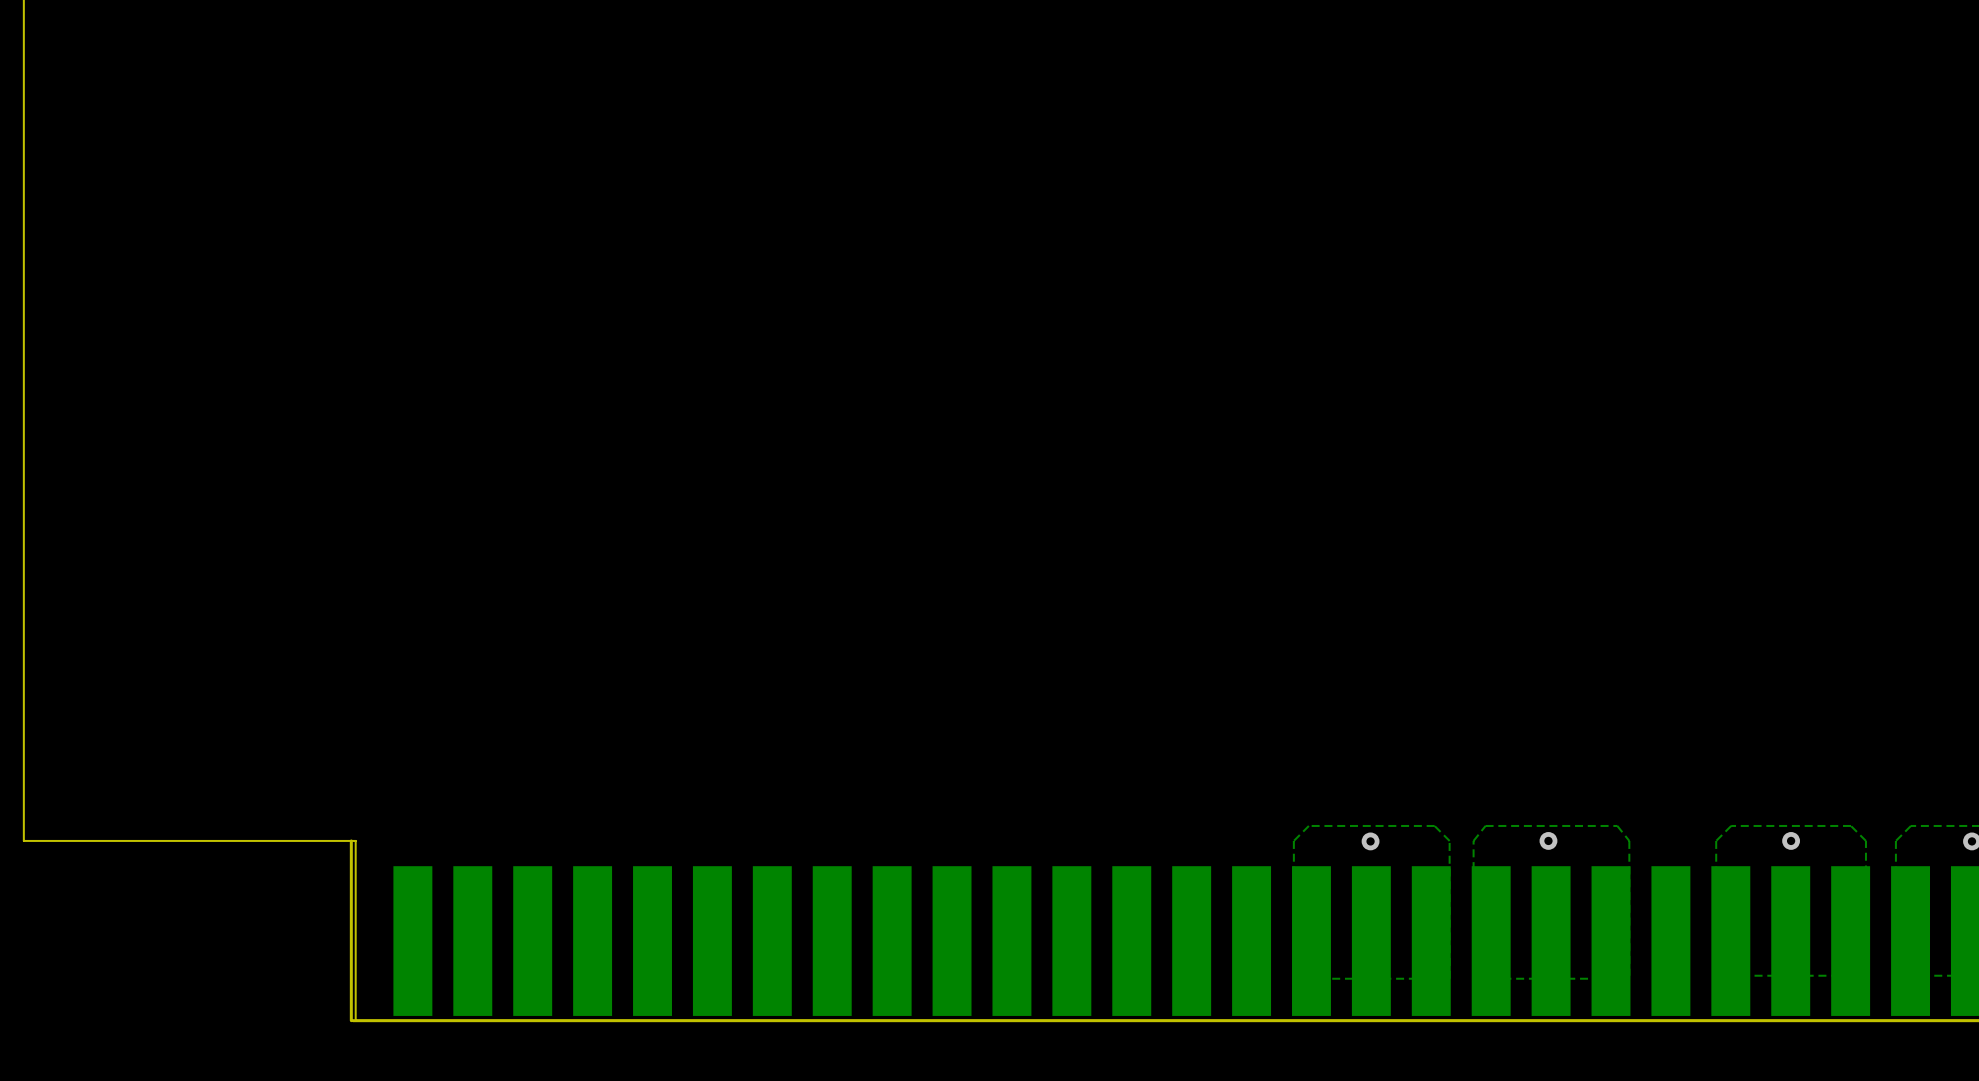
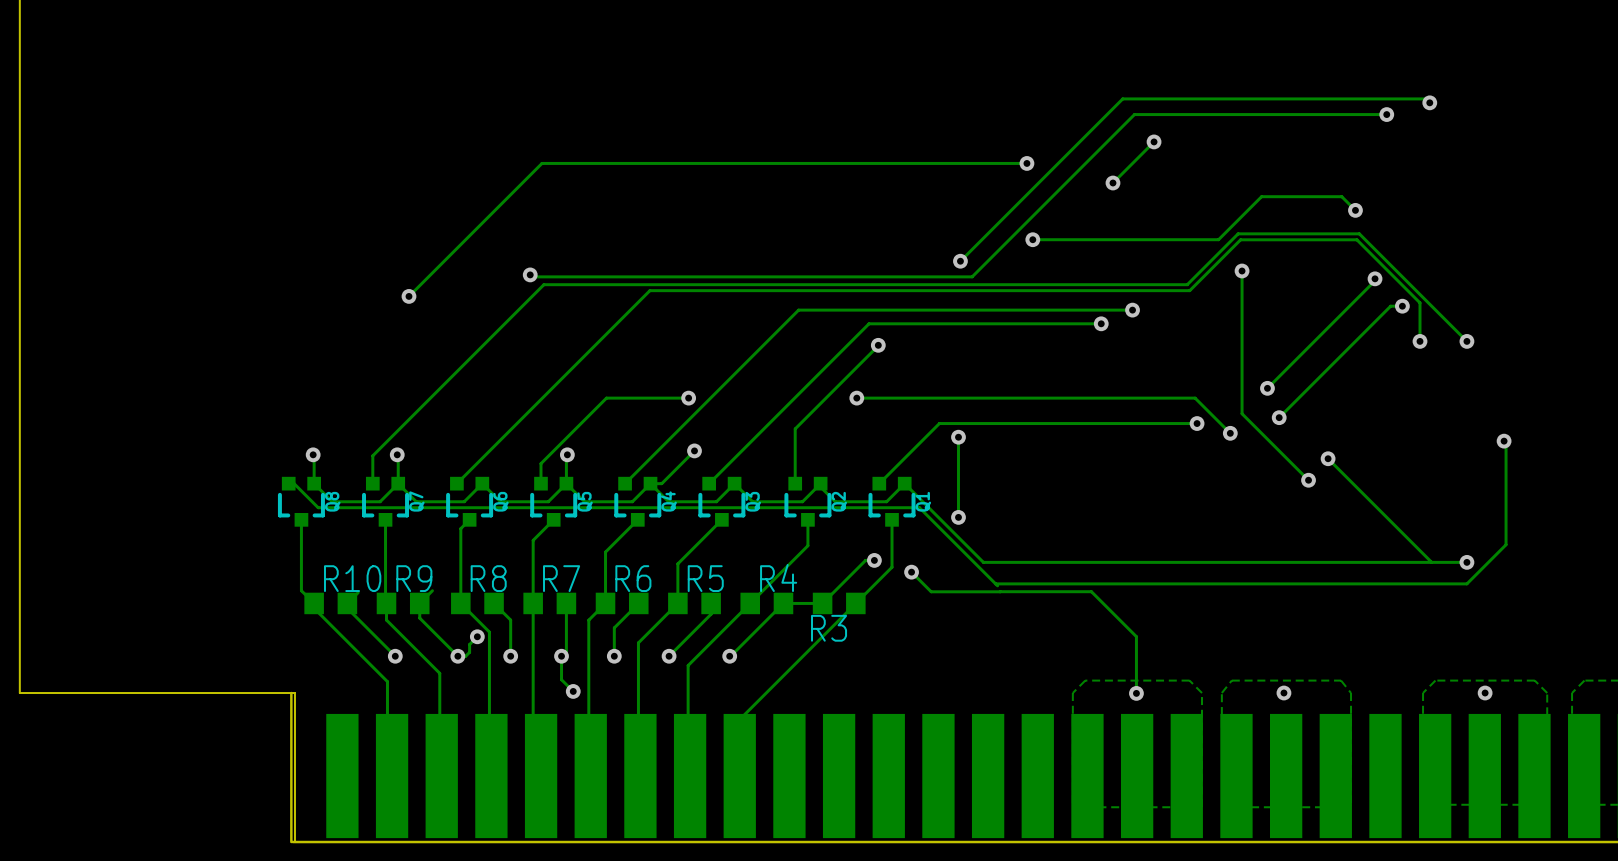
track: none -> (1429, 102) (1425, 98) (1122, 98) (960, 261)
via: none -> (1429, 102)
track: none -> (1386, 114) (1134, 114) (972, 276) (532, 276) (530, 274)
via: none -> (1386, 114)
track: none -> (1154, 141) (1112, 183)
via: none -> (1154, 141)
track: none -> (1026, 163) (541, 163) (408, 296)
via: none -> (1026, 163)
via: none -> (1112, 183)
track: none -> (1355, 210) (1341, 196) (1261, 196) (1218, 239) (1032, 239)
via: none -> (1355, 210)
via: none -> (1032, 239)
via: none -> (960, 261)
track: none -> (1242, 271) (1242, 413) (1308, 480)
via: none -> (1242, 271)
via: none -> (530, 274)
track: none -> (1375, 278) (1267, 388)
via: none -> (1375, 278)
via: none -> (408, 296)
track: none -> (1402, 306) (1390, 306) (1279, 417)
via: none -> (1402, 306)
track: none -> (1132, 310) (798, 310) (625, 483)
via: none -> (1132, 310)
track: none -> (1101, 323) (869, 323) (709, 483)
via: none -> (1101, 323)
track: none -> (1420, 341) (1420, 302) (1356, 239) (1240, 239) (1189, 290) (649, 290) (456, 483)
via: none -> (1420, 341)
track: none -> (1466, 341) (1359, 233) (1238, 233) (1187, 284) (543, 284) (372, 455) (372, 483)
via: none -> (1466, 341)
track: none -> (878, 345) (795, 428) (795, 483)
via: none -> (878, 345)
via: none -> (1267, 388)
track: none -> (688, 398) (606, 398) (540, 463) (540, 483)
via: none -> (688, 398)
track: none -> (856, 398) (1195, 398) (1230, 433)
via: none -> (856, 398)
via: none -> (1279, 417)
track: none -> (1197, 423) (939, 423) (879, 483)
via: none -> (1197, 423)
via: none -> (1230, 433)
track: none -> (958, 437) (958, 517)
via: none -> (958, 437)
track: none -> (1504, 441) (1506, 443) (1506, 544) (1466, 583) (995, 583)
via: none -> (1504, 441)
track: none -> (694, 450) (661, 483) (650, 483)
via: none -> (694, 450)
track: none -> (313, 454) (314, 483) (332, 501) (380, 501) (398, 483)
via: none -> (313, 454)
track: none -> (397, 454) (398, 483)
via: none -> (397, 454)
track: none -> (567, 454) (566, 483)
via: none -> (567, 454)
track: none -> (1328, 458) (1431, 562)
via: none -> (1328, 458)
via: none -> (1308, 480)
track: none -> (288, 483) (294, 483) (318, 507) (919, 507) (997, 585)
track: none -> (566, 483) (548, 501) (500, 501) (482, 483) (464, 501) (416, 501) (398, 483)
track: none -> (650, 483) (668, 501) (716, 501) (734, 483) (752, 501) (802, 501) (820, 483) (820, 487) (835, 501) (886, 501) (904, 483) (983, 562) (1466, 562)
track: none -> (650, 483) (632, 501) (584, 501) (566, 483)
Q8: none -> (301, 501)
Q7: none -> (385, 501)
Q6: none -> (469, 501)
Q5: none -> (553, 501)
Q4: none -> (637, 501)
Q3: none -> (721, 501)
Q2: none -> (807, 501)
Q1: none -> (892, 501)
via: none -> (958, 517)
track: none -> (301, 519) (301, 590) (314, 603) (314, 608) (387, 681) (387, 773) (390, 776)
track: none -> (385, 519) (386, 620) (439, 673) (439, 776)
track: none -> (469, 519) (460, 528) (460, 603) (489, 632) (489, 776)
track: none -> (553, 519) (533, 540) (533, 770) (539, 776)
track: none -> (637, 519) (605, 552) (605, 603) (588, 620) (588, 776)
track: none -> (721, 519) (677, 563) (677, 603) (638, 642) (638, 776)
track: none -> (807, 519) (807, 545) (688, 665) (688, 776)
track: none -> (892, 519) (892, 567) (737, 721) (737, 776)
track: none -> (874, 560) (865, 560) (822, 603) (783, 603) (729, 656)
via: none -> (874, 560)
via: none -> (1466, 562)
track: none -> (911, 572) (931, 591) (1091, 591) (1136, 636) (1136, 693)
via: none -> (911, 572)
track: none -> (432, 590) (419, 603) (419, 618) (457, 656) (465, 656) (469, 652) (469, 644) (477, 636)
track: none -> (358, 592) (347, 603) (347, 608) (395, 656)
track: none -> (498, 598) (494, 603) (510, 620) (510, 656)
R10: none -> (330, 603)
R9: none -> (403, 603)
R8: none -> (477, 603)
R7: none -> (549, 603)
track: none -> (566, 603) (566, 651) (561, 656) (561, 679) (573, 691)
R6: none -> (622, 603)
track: none -> (638, 603) (614, 627) (614, 656)
R5: none -> (694, 603)
track: none -> (711, 603) (711, 614) (669, 656)
R4: none -> (766, 603)
R3: none -> (839, 603)
via: none -> (477, 636)
via: none -> (395, 656)
via: none -> (457, 656)
via: none -> (510, 656)
via: none -> (561, 656)
via: none -> (614, 656)
via: none -> (669, 656)
via: none -> (729, 656)
via: none -> (573, 691)

